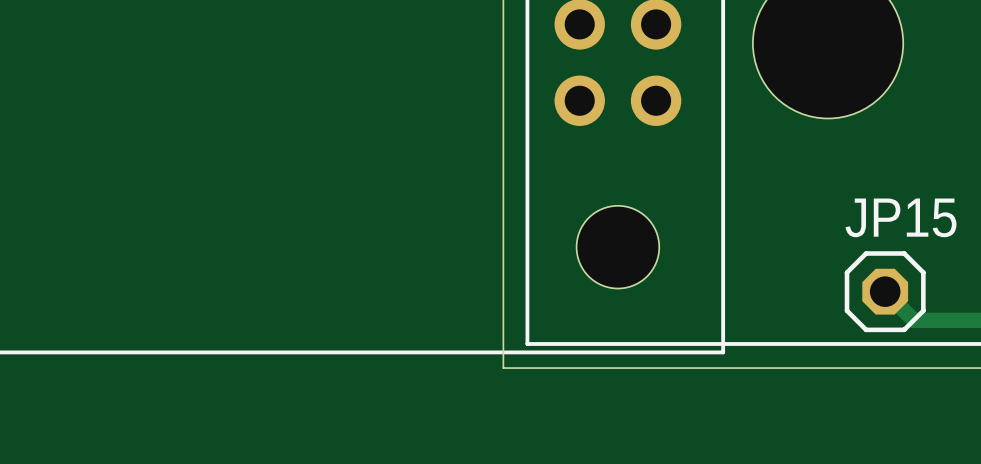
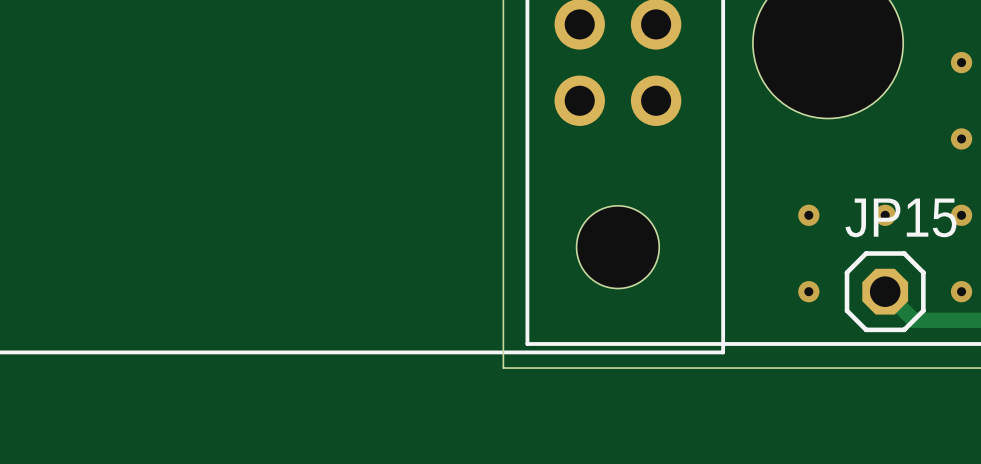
via: none -> (961, 62)
via: none -> (961, 138)
via: none -> (808, 215)
via: none -> (885, 215)
via: none -> (961, 215)
via: none -> (808, 291)
via: none -> (961, 291)

